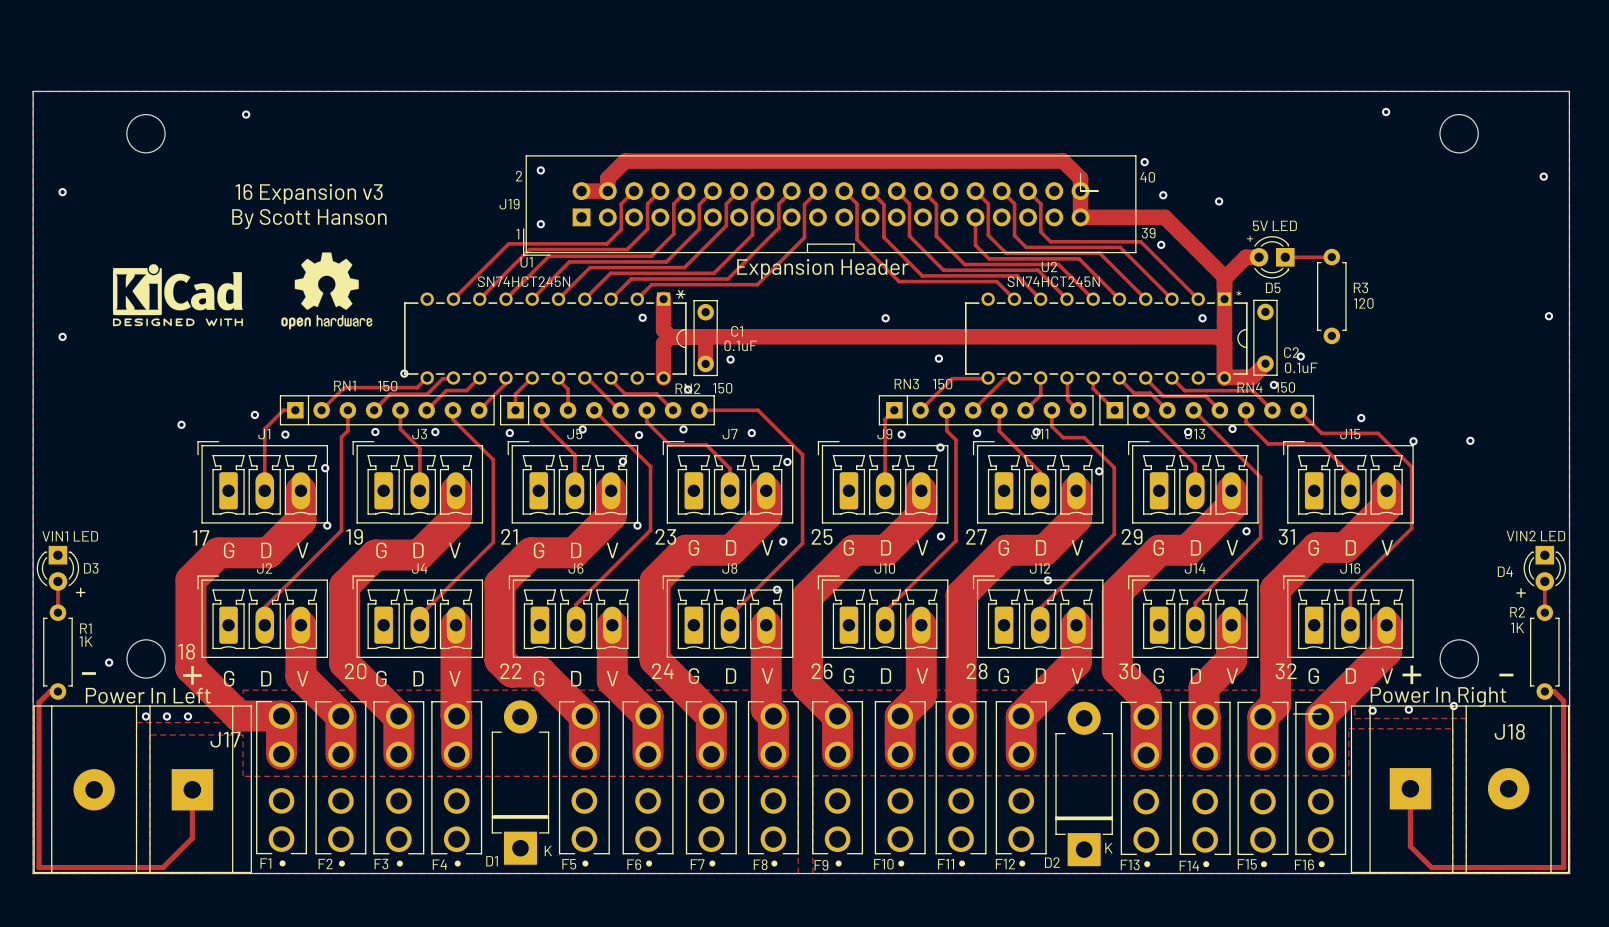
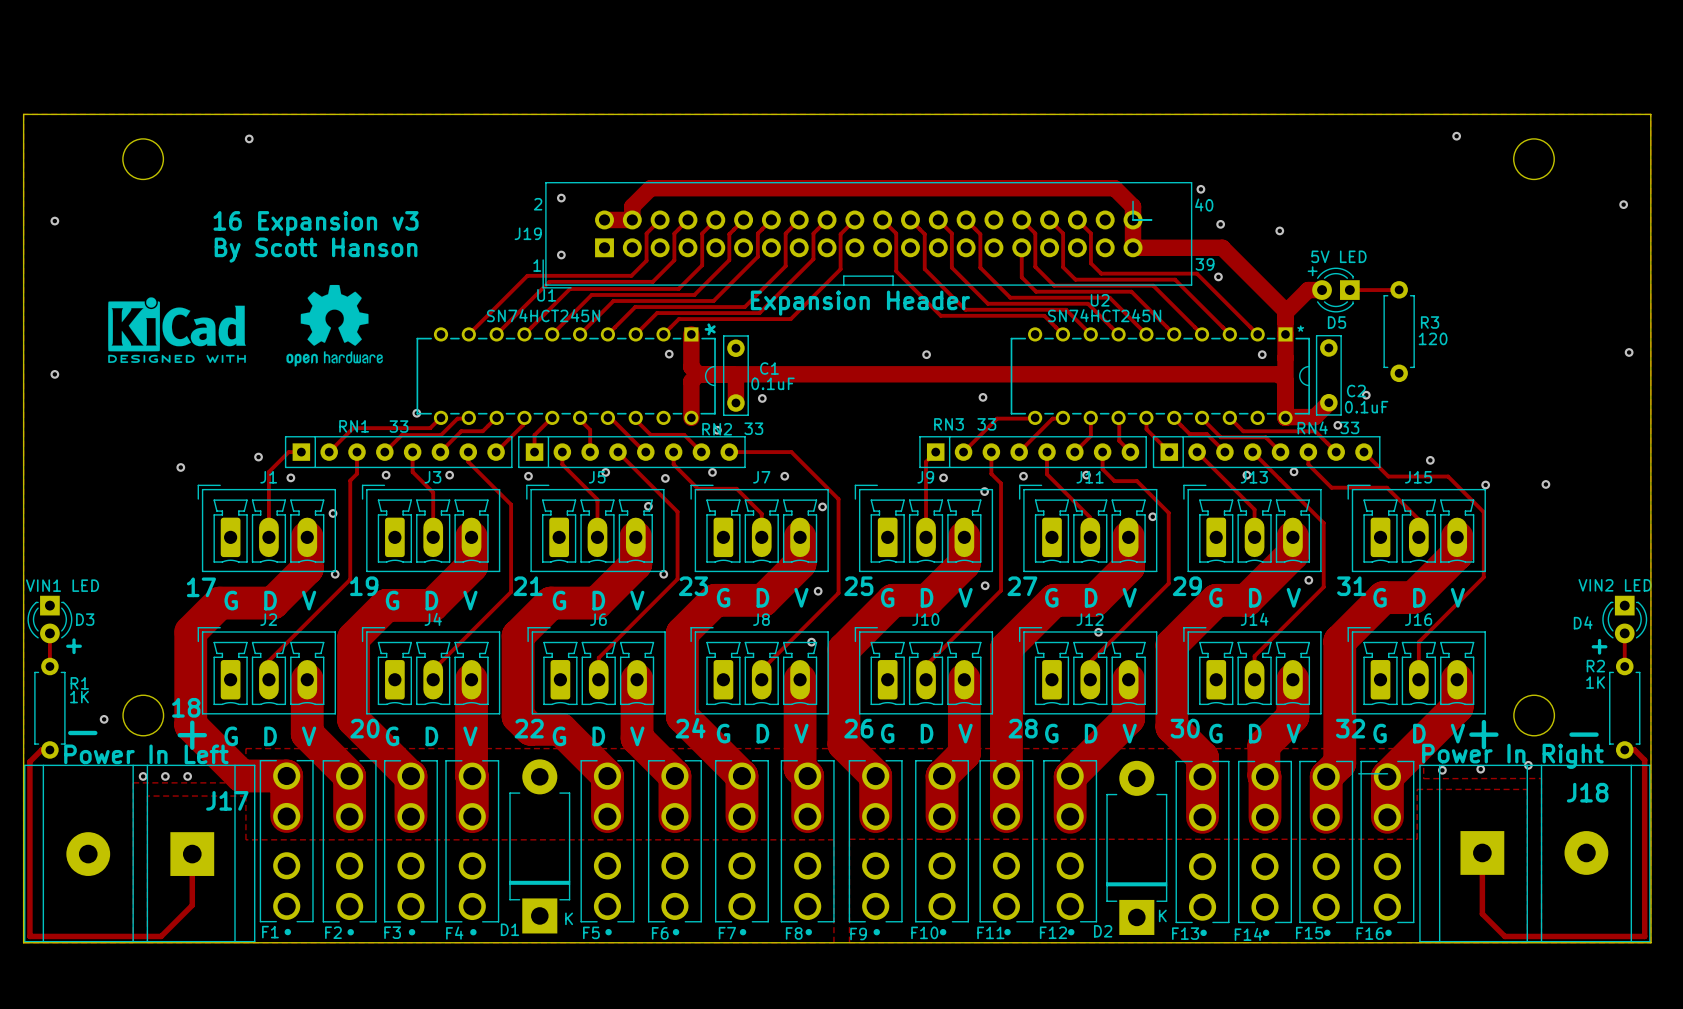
RN3 value: 150 (942, 384) -> 33 (986, 424)
RN1 value: 150 (387, 386) -> 33 (399, 426)
RN4 value: 150 (1285, 387) -> 33 (1349, 427)
RN2 value: 150 (722, 388) -> 33 (753, 428)

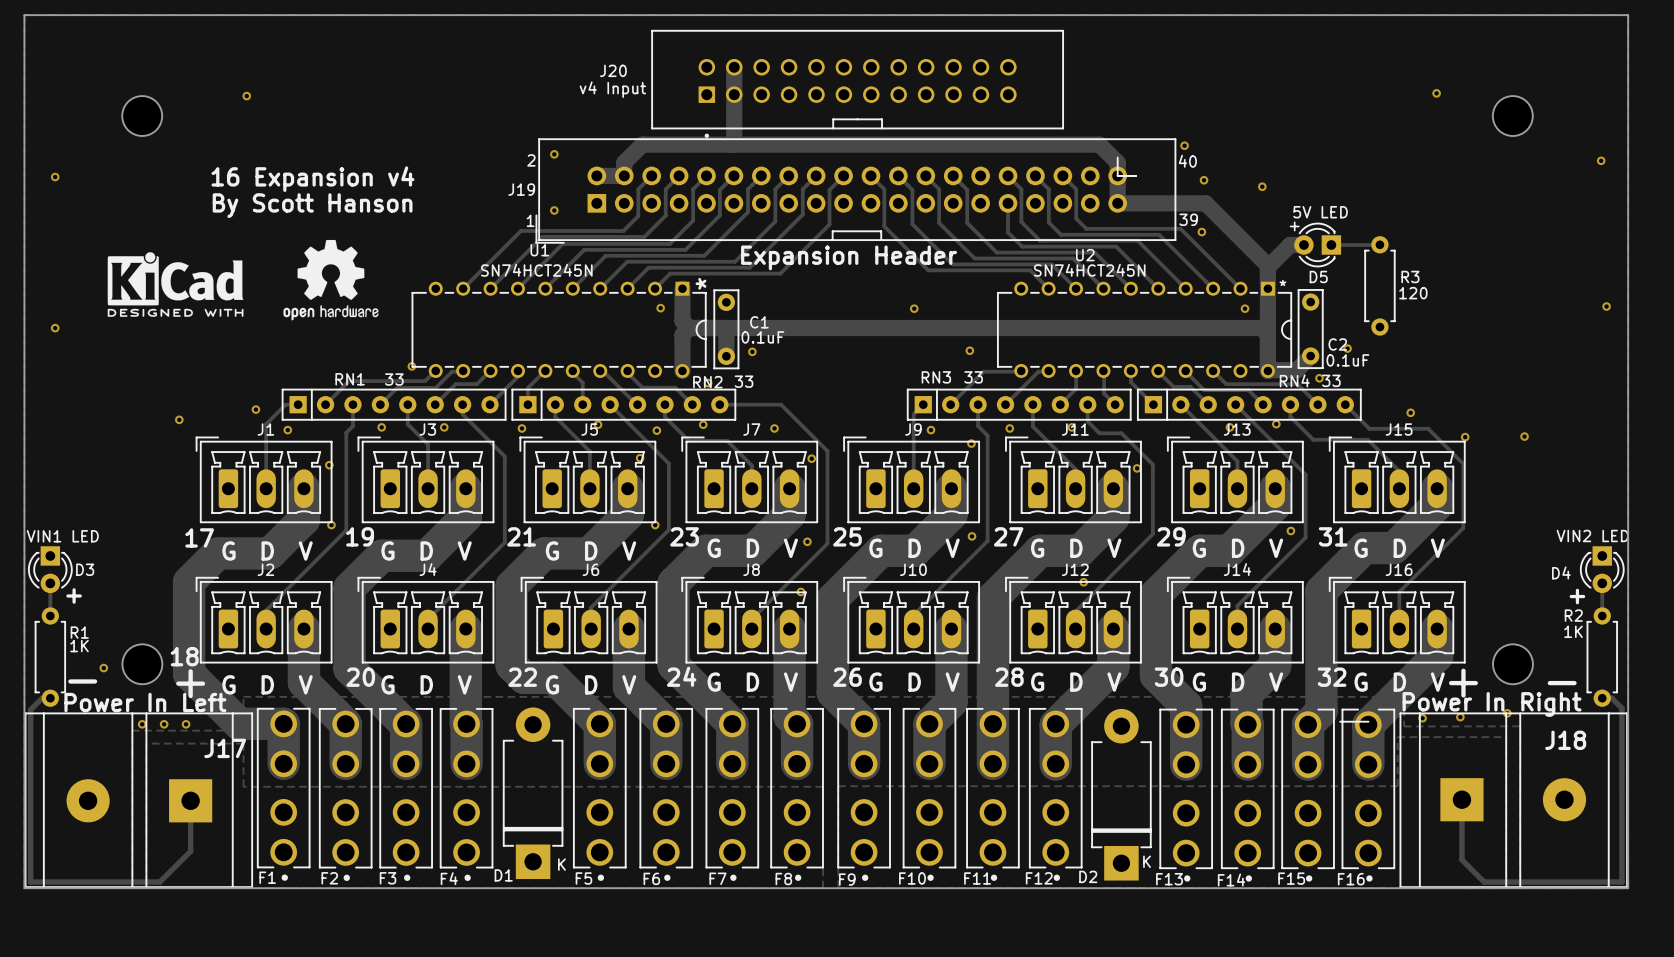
track: none -> (734, 67) (734, 142) (732, 144)
board edge: (23, 114) (1650, 114) (1651, 942) -> (24, 71) (24, 15) (1628, 15) (1628, 888)
J20: none -> v4 Input (857, 84)
text: 16 Expansion v3 (316, 223) -> 16 Expansion v4 (312, 179)

